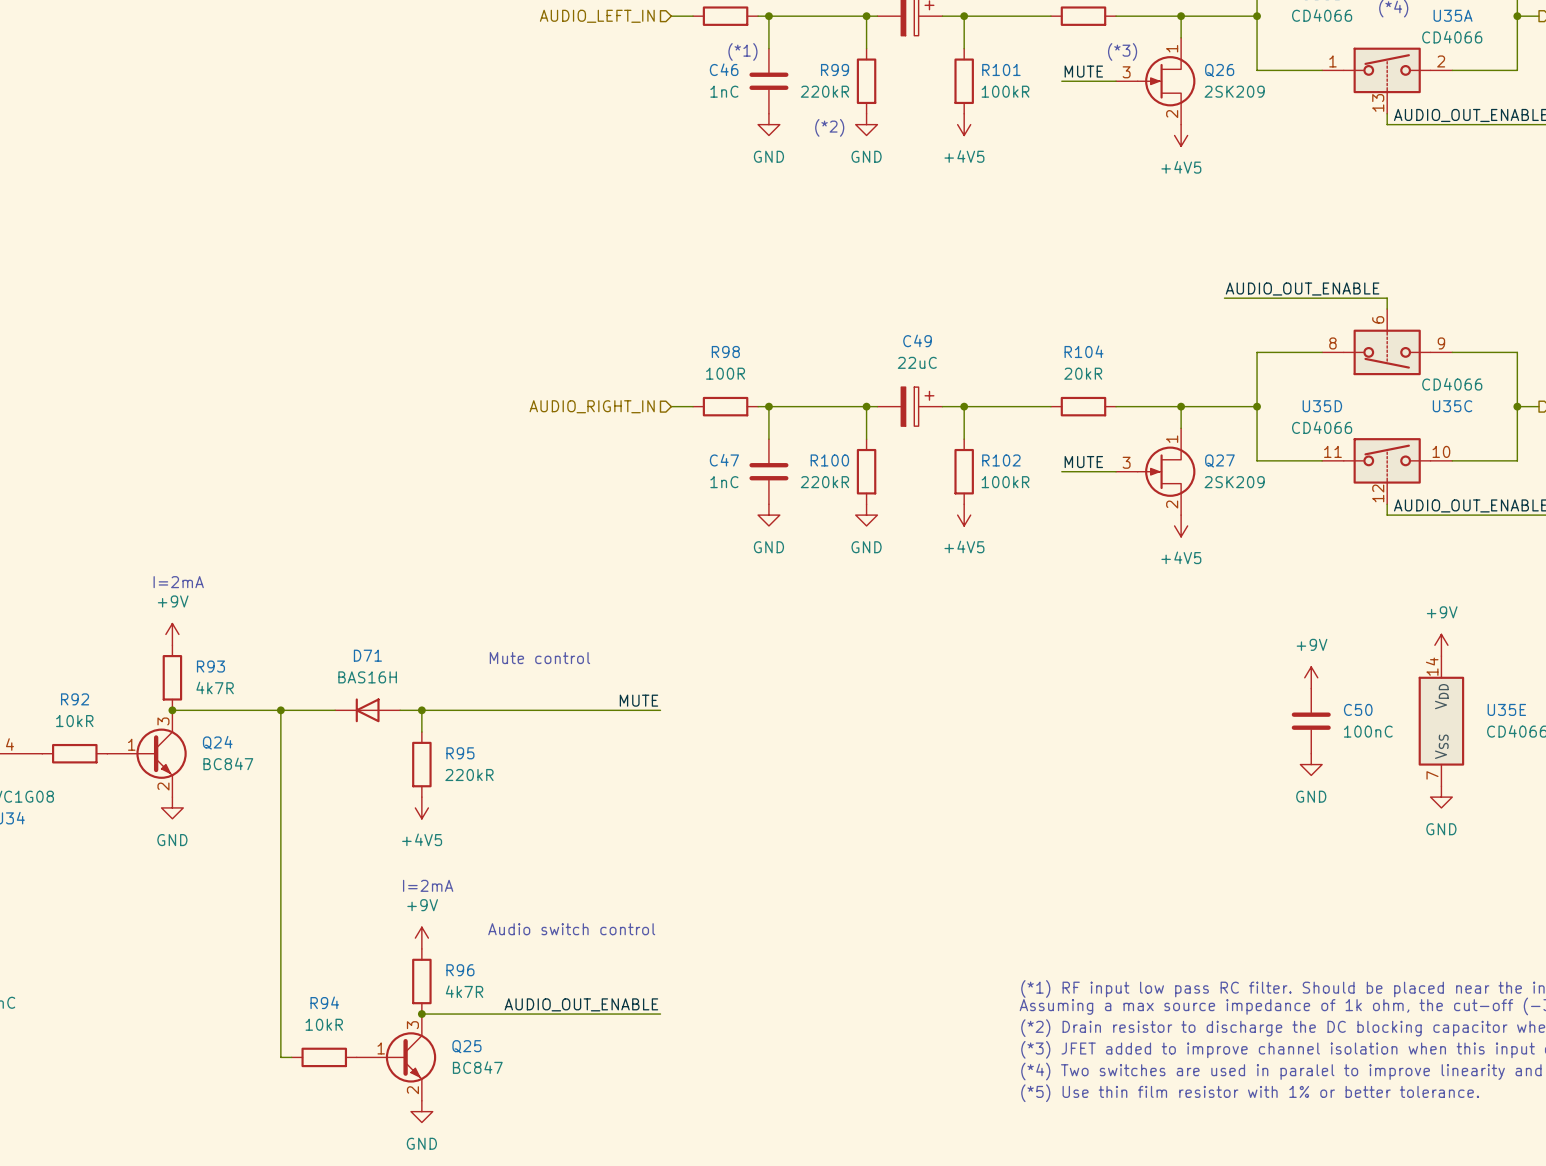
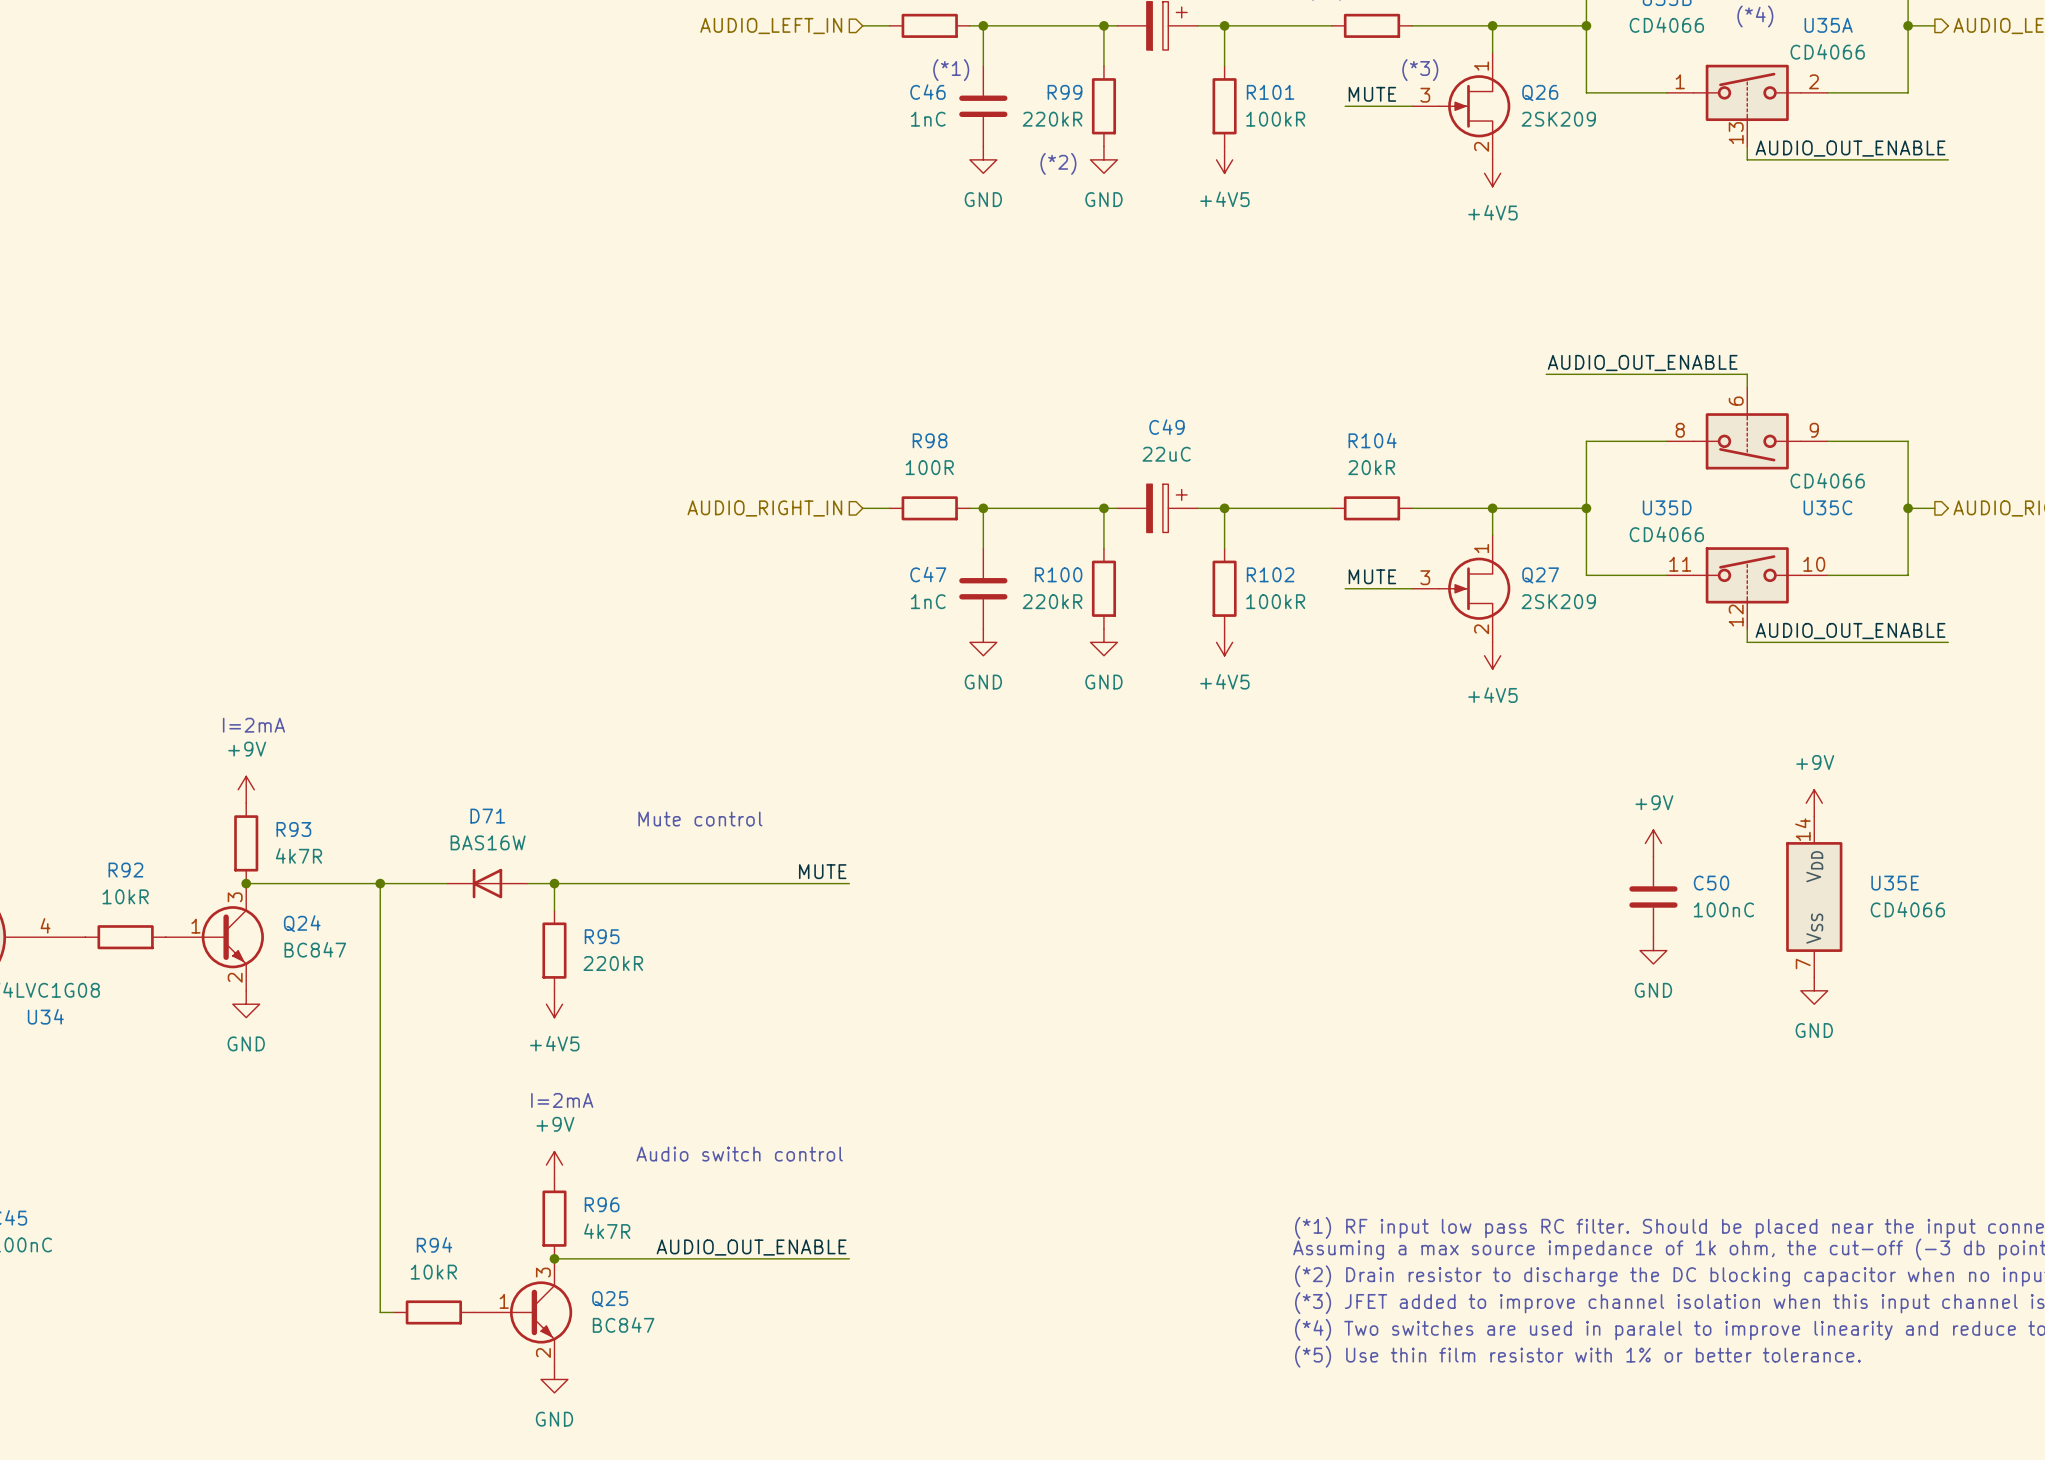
D71 value: BAS16H (367, 677) -> BAS16W (488, 842)

